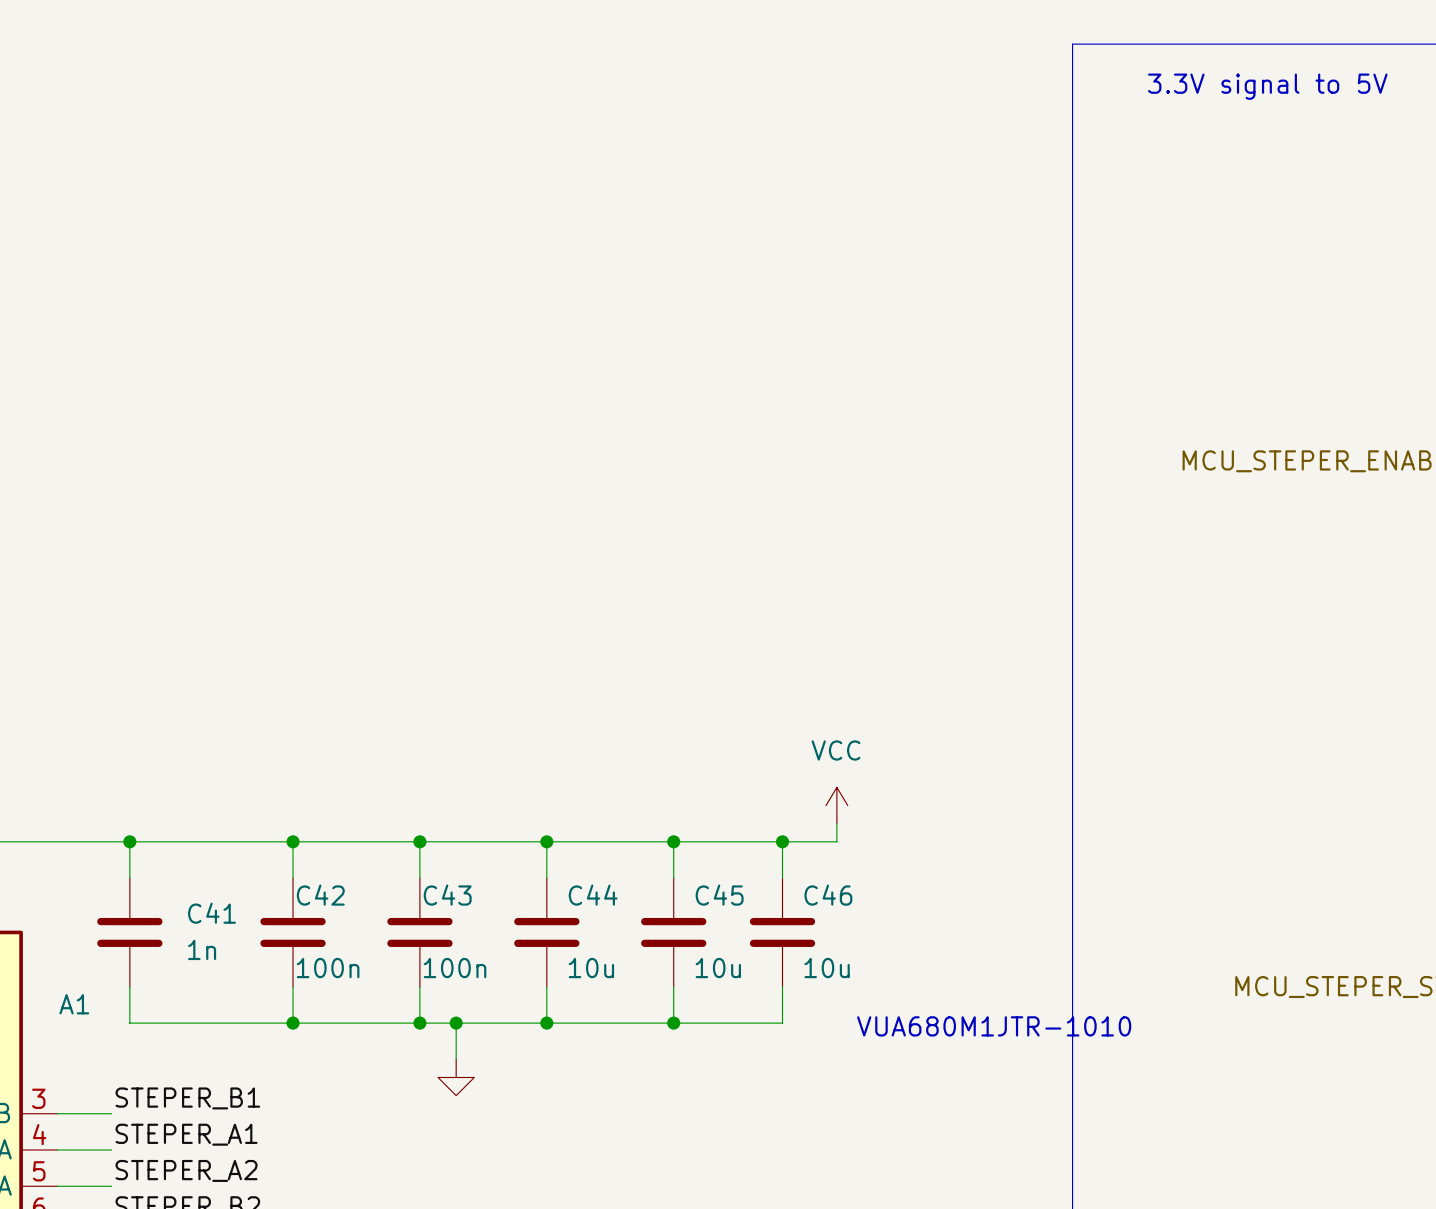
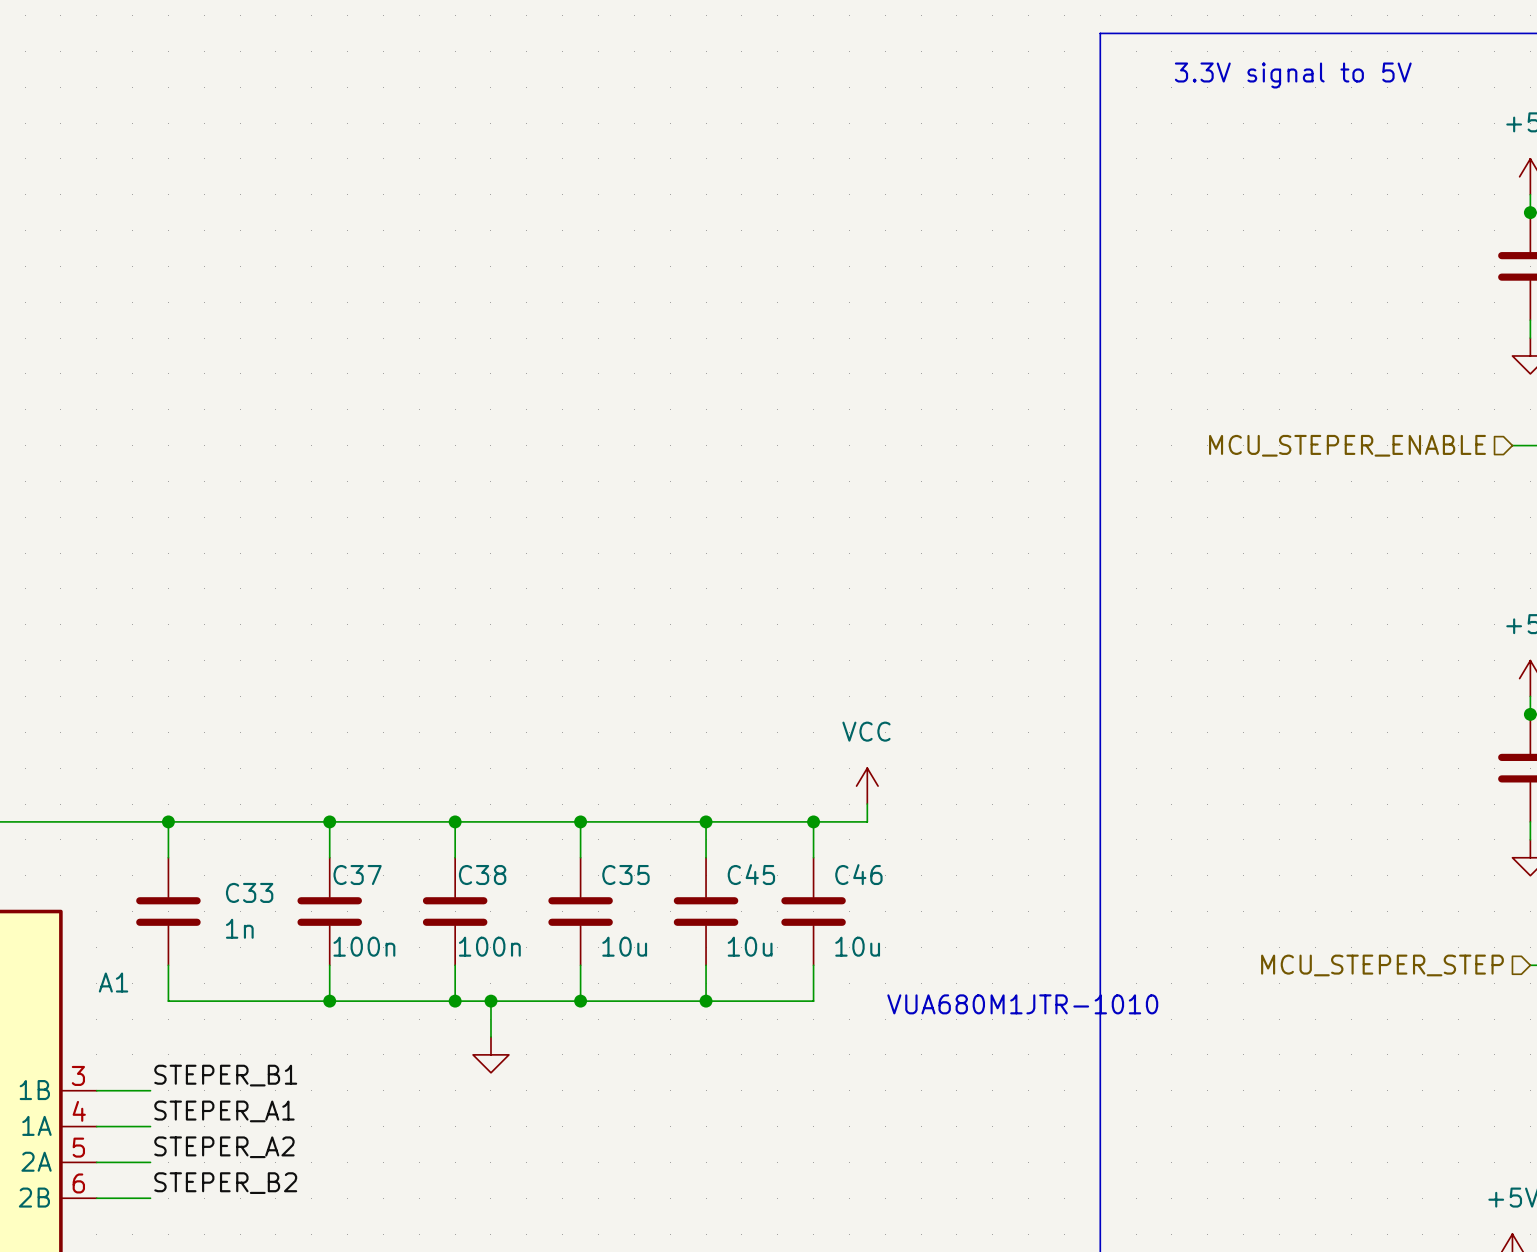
C42 name: C42 (320, 895) -> C37 (357, 875)
C43 name: C43 (447, 895) -> C38 (482, 875)
C44 name: C44 (593, 895) -> C35 (625, 875)
C41 name: C41 (212, 913) -> C33 (249, 892)

